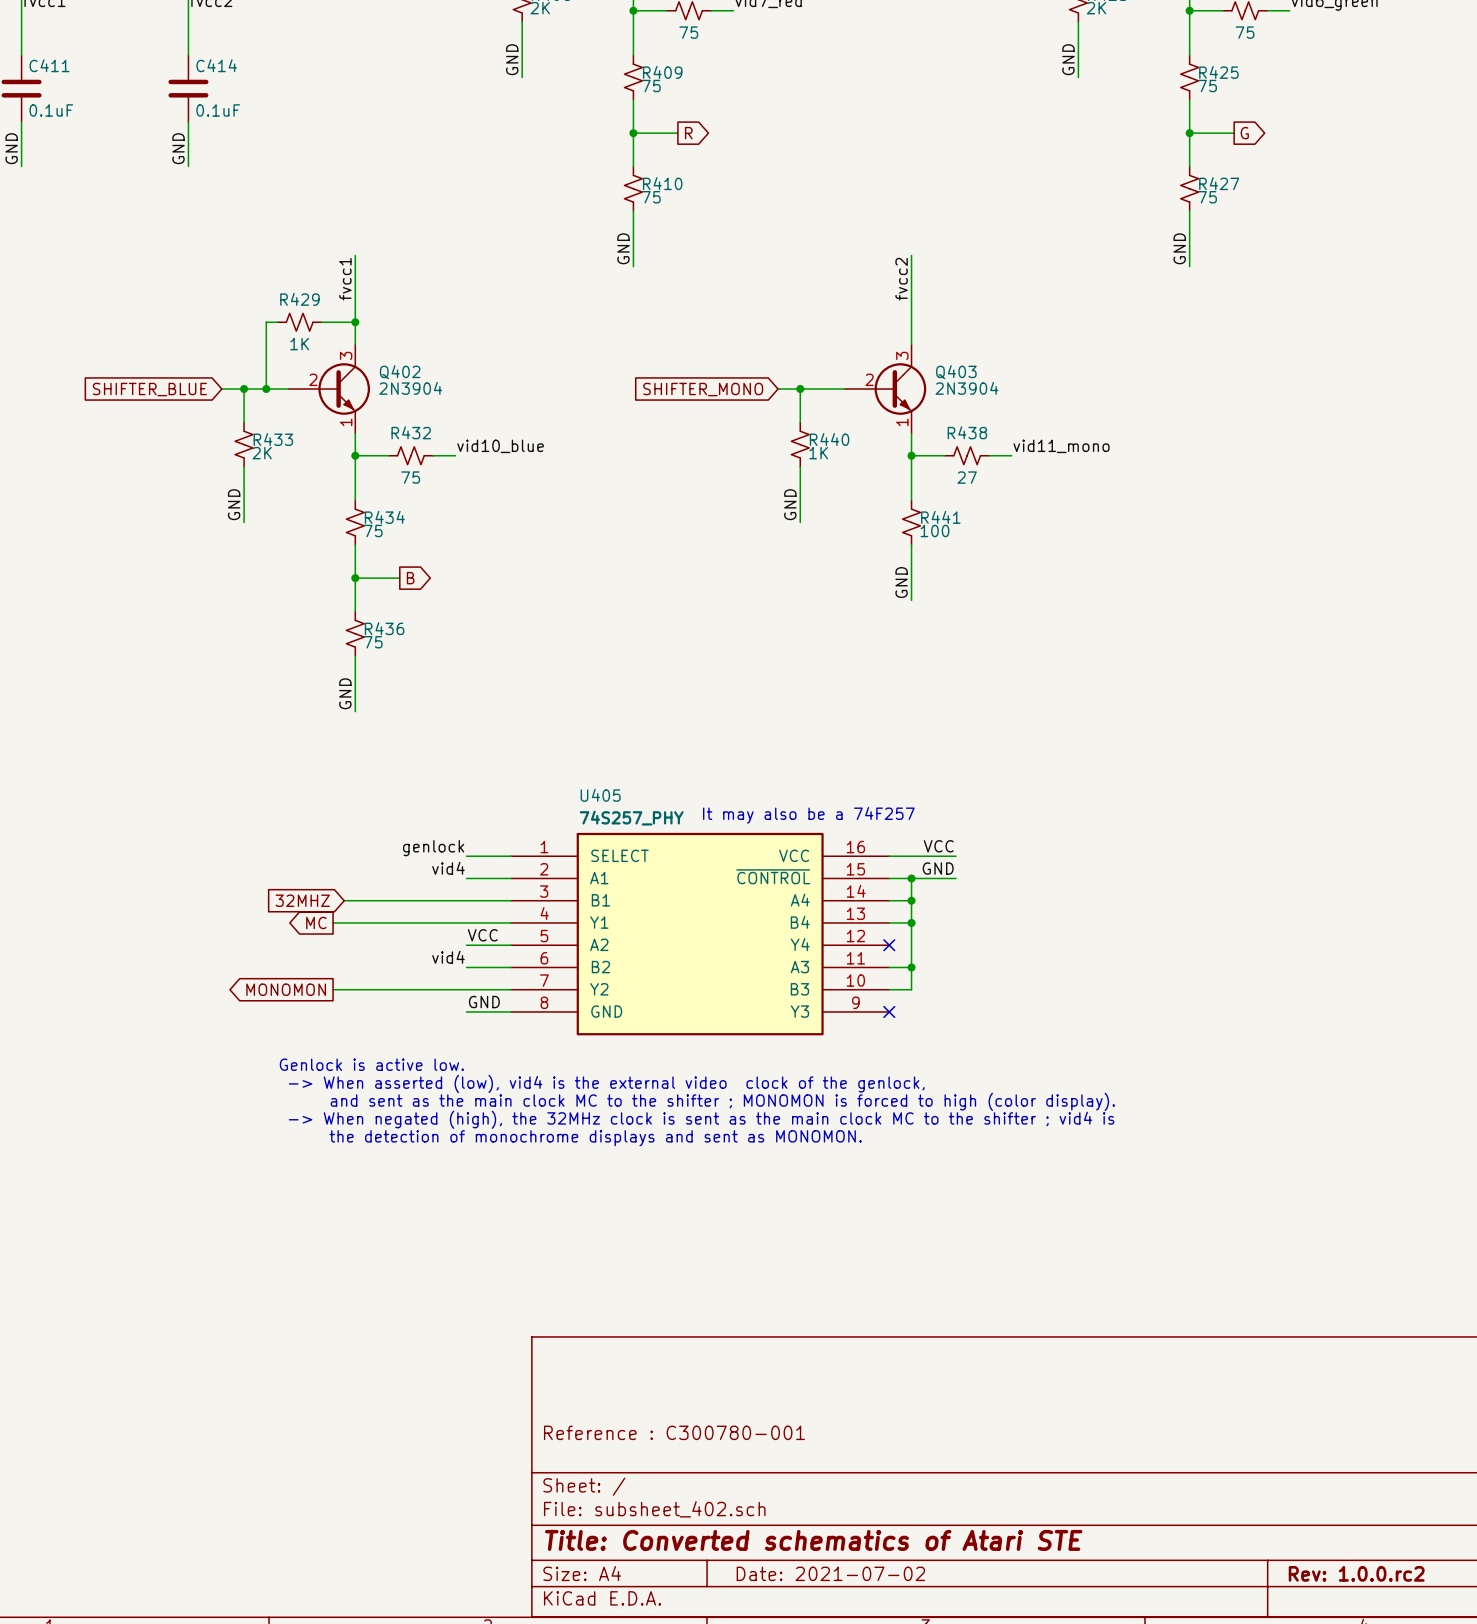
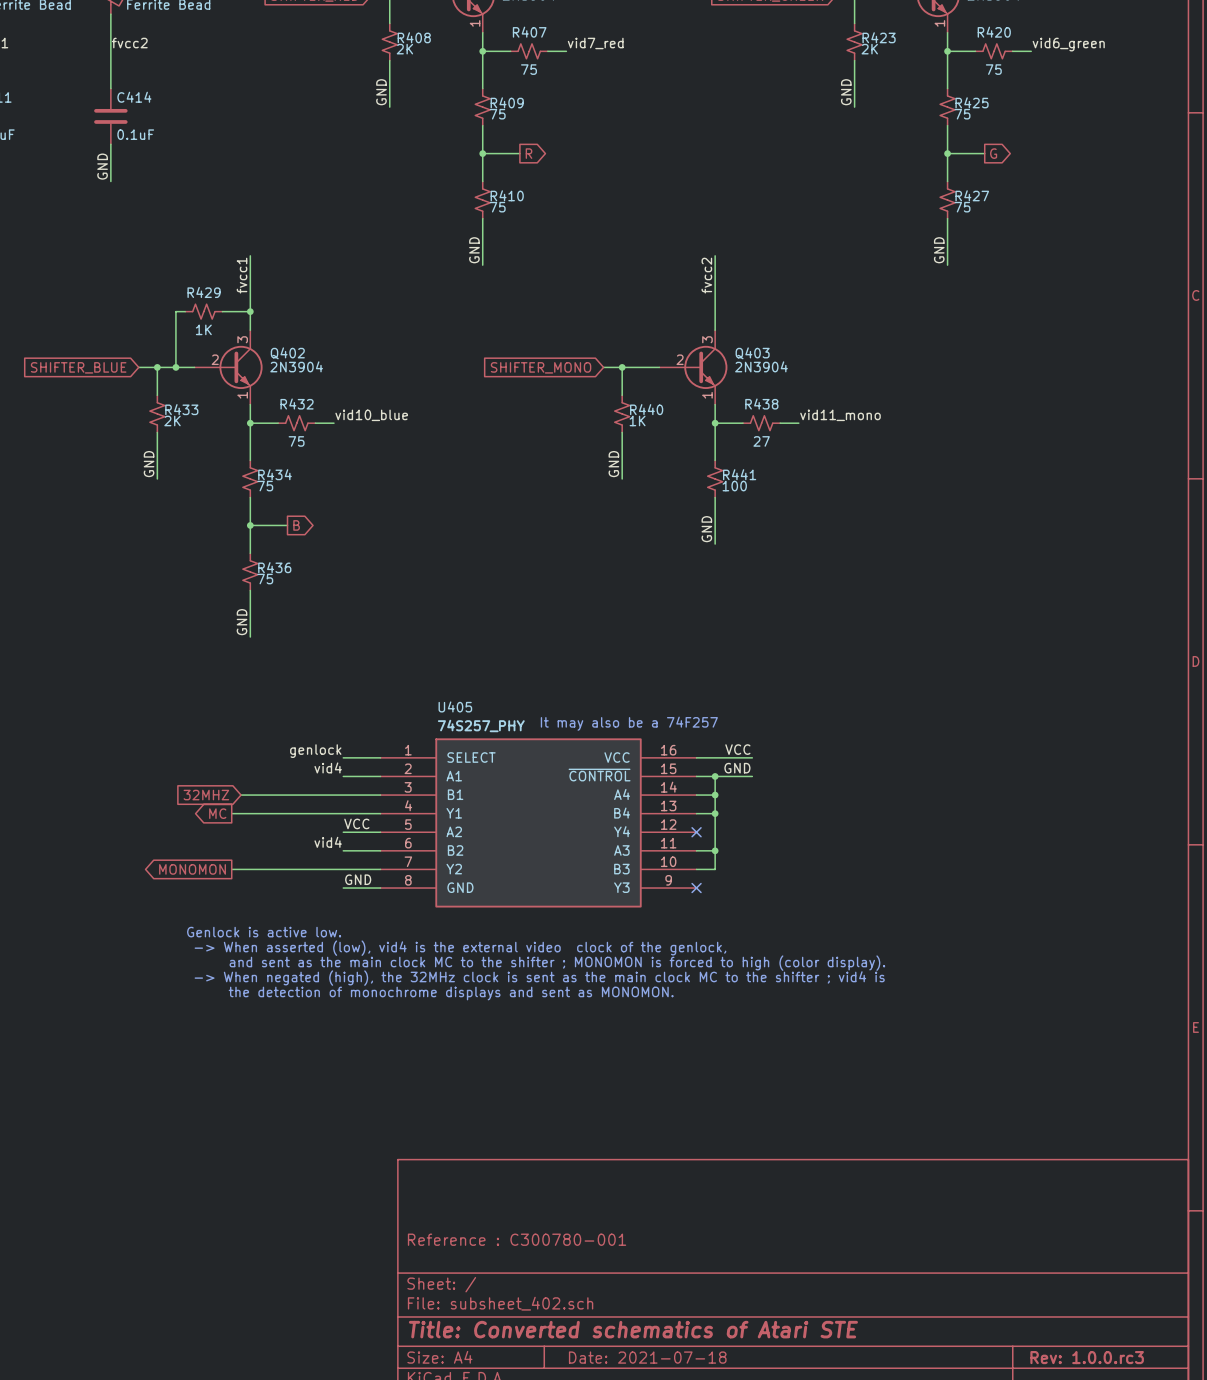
title block: Date: 2021-07-02 (830, 1573) -> Date: 2021-07-18 (647, 1357)
title block: Rev: 1.0.0.rc2 (1356, 1573) -> Rev: 1.0.0.rc3 (1087, 1357)

